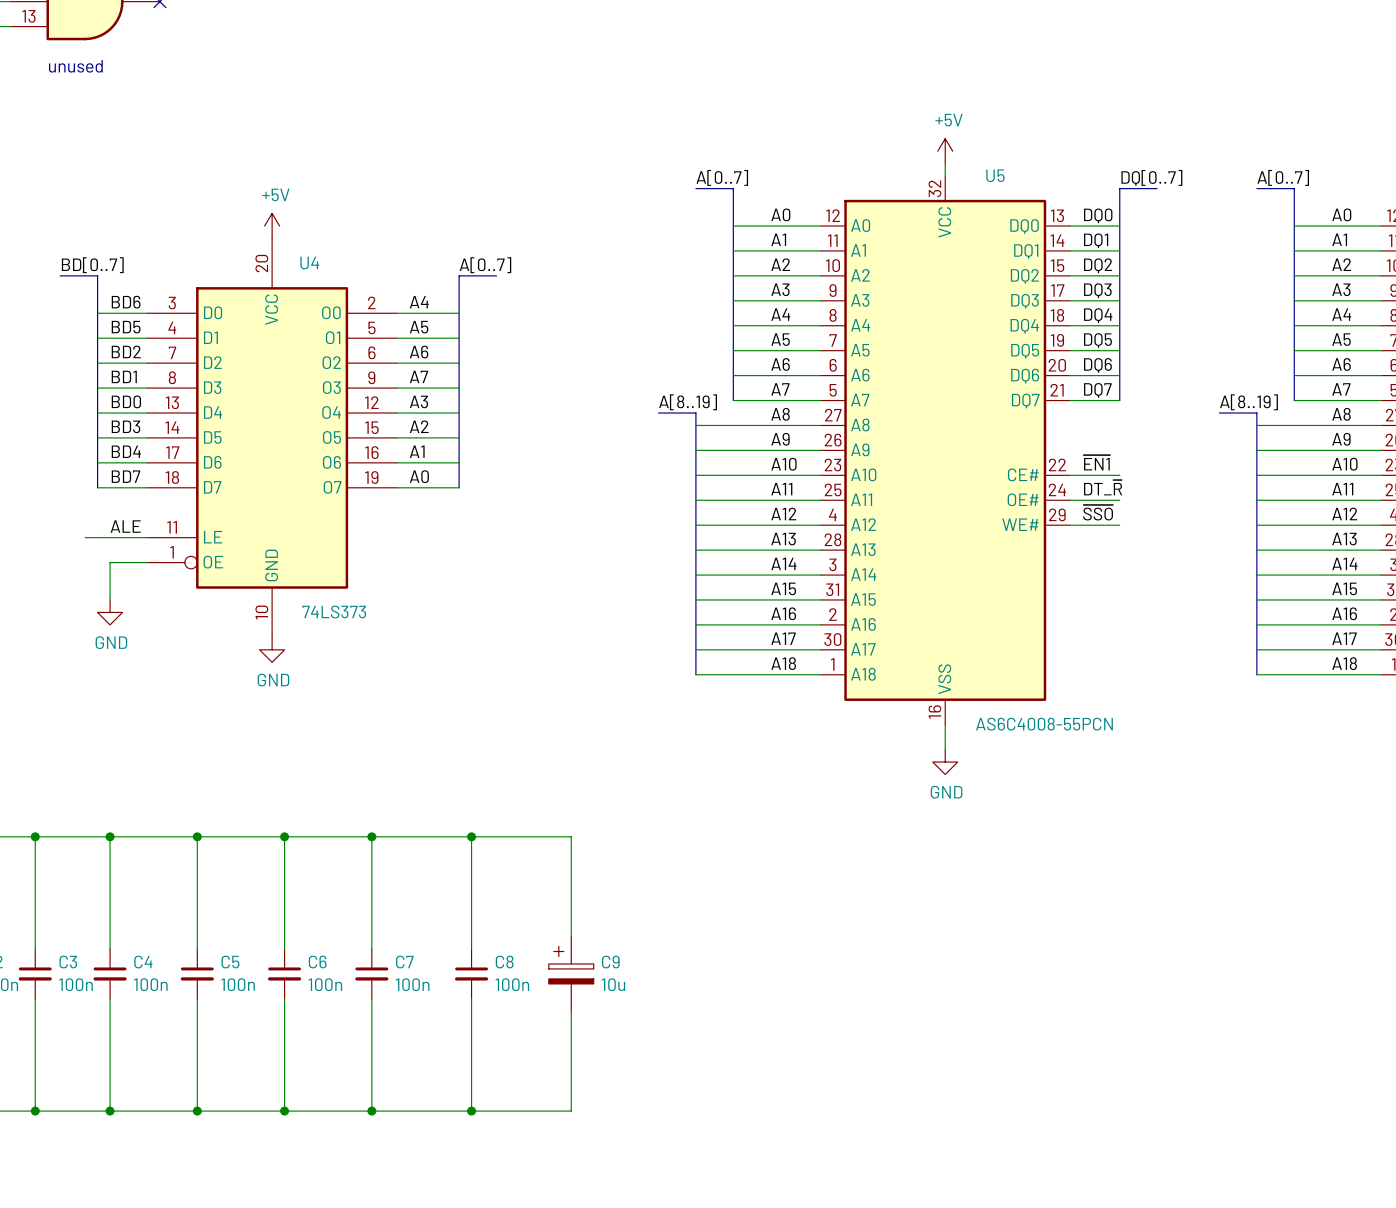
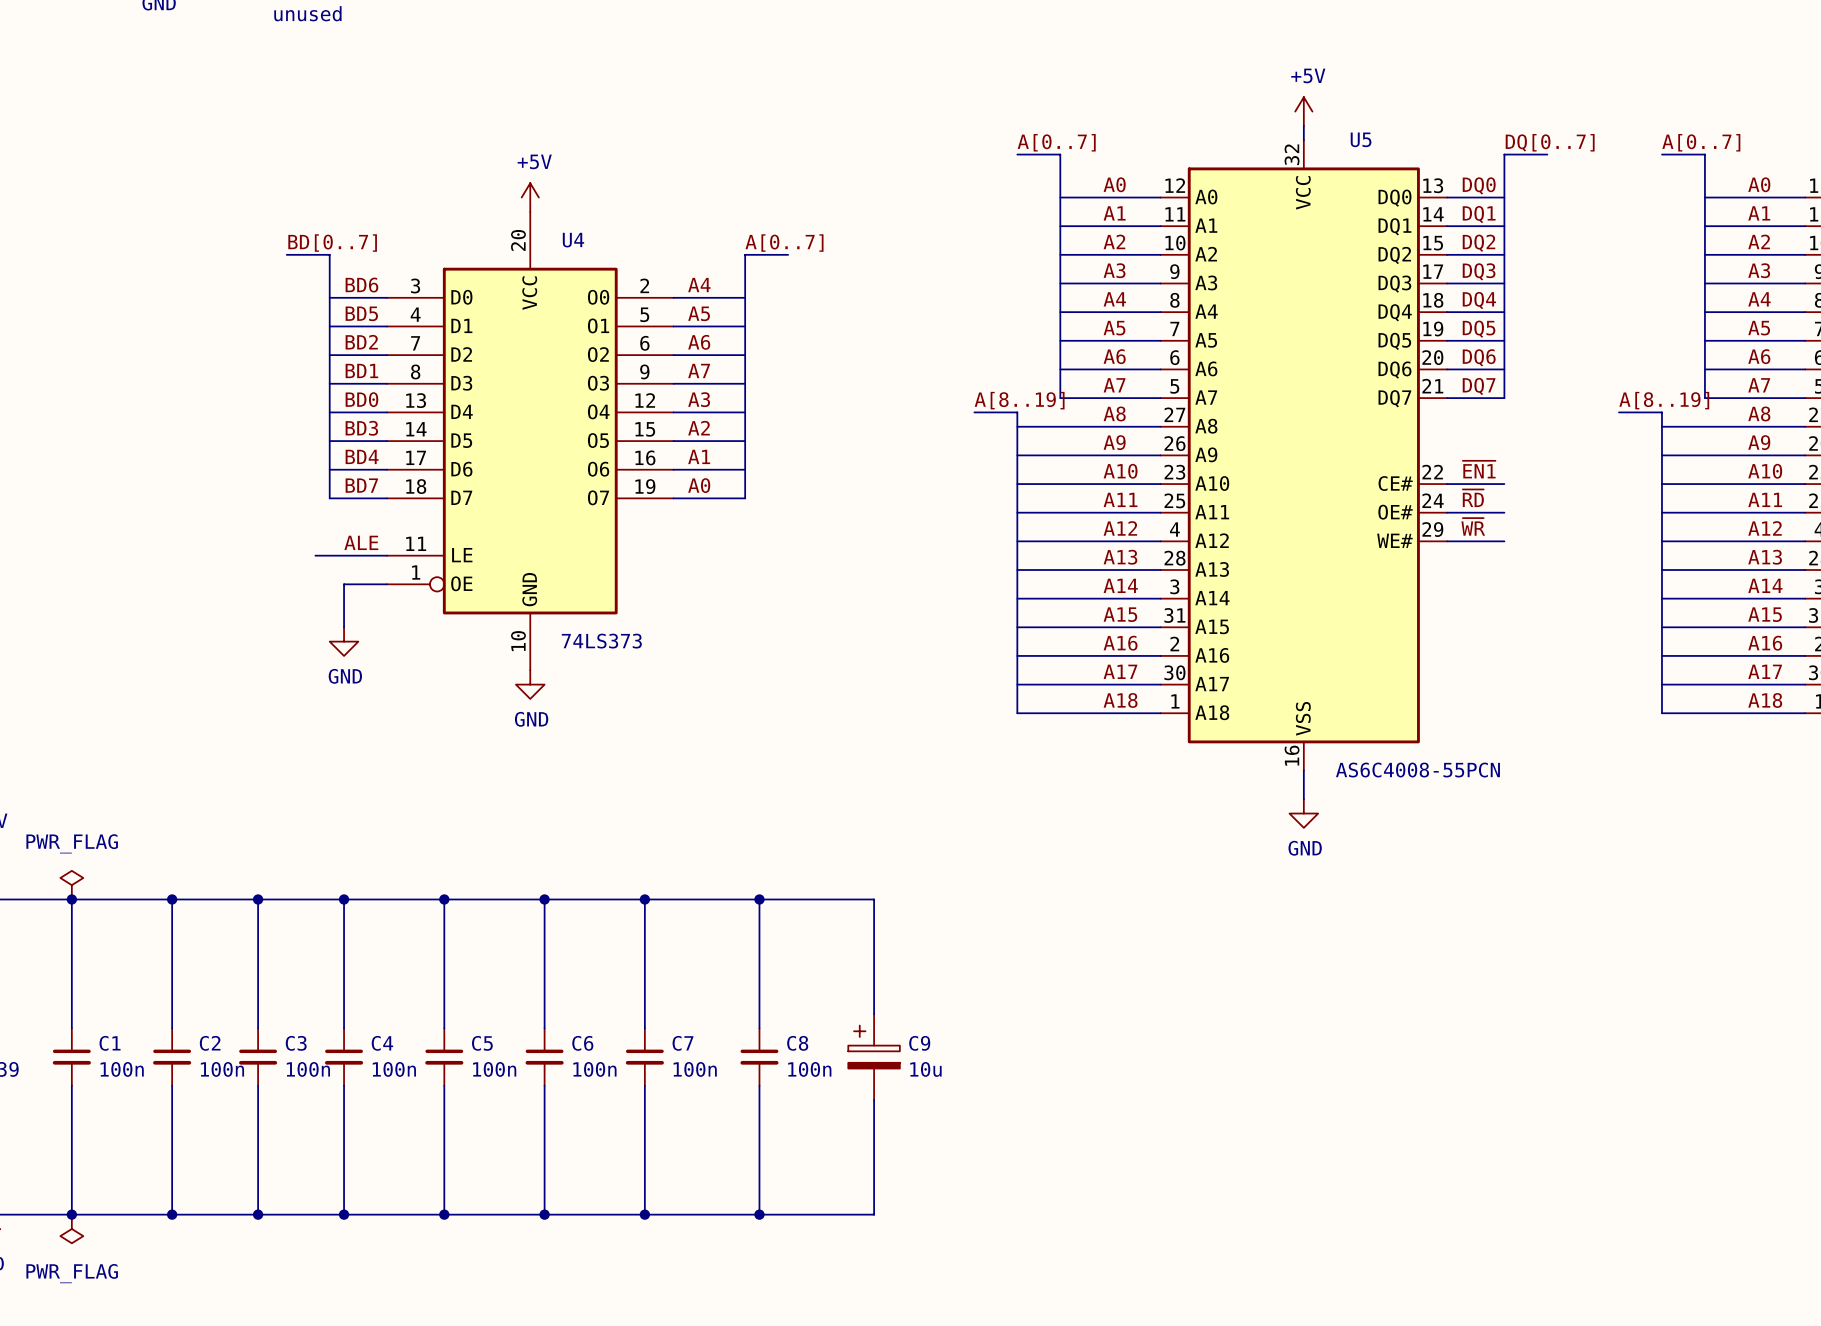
label: DT_~{R} (1103, 487) -> ~{RD} (1473, 498)
label: ~{SSO} (1098, 512) -> ~{WR} (1473, 526)

